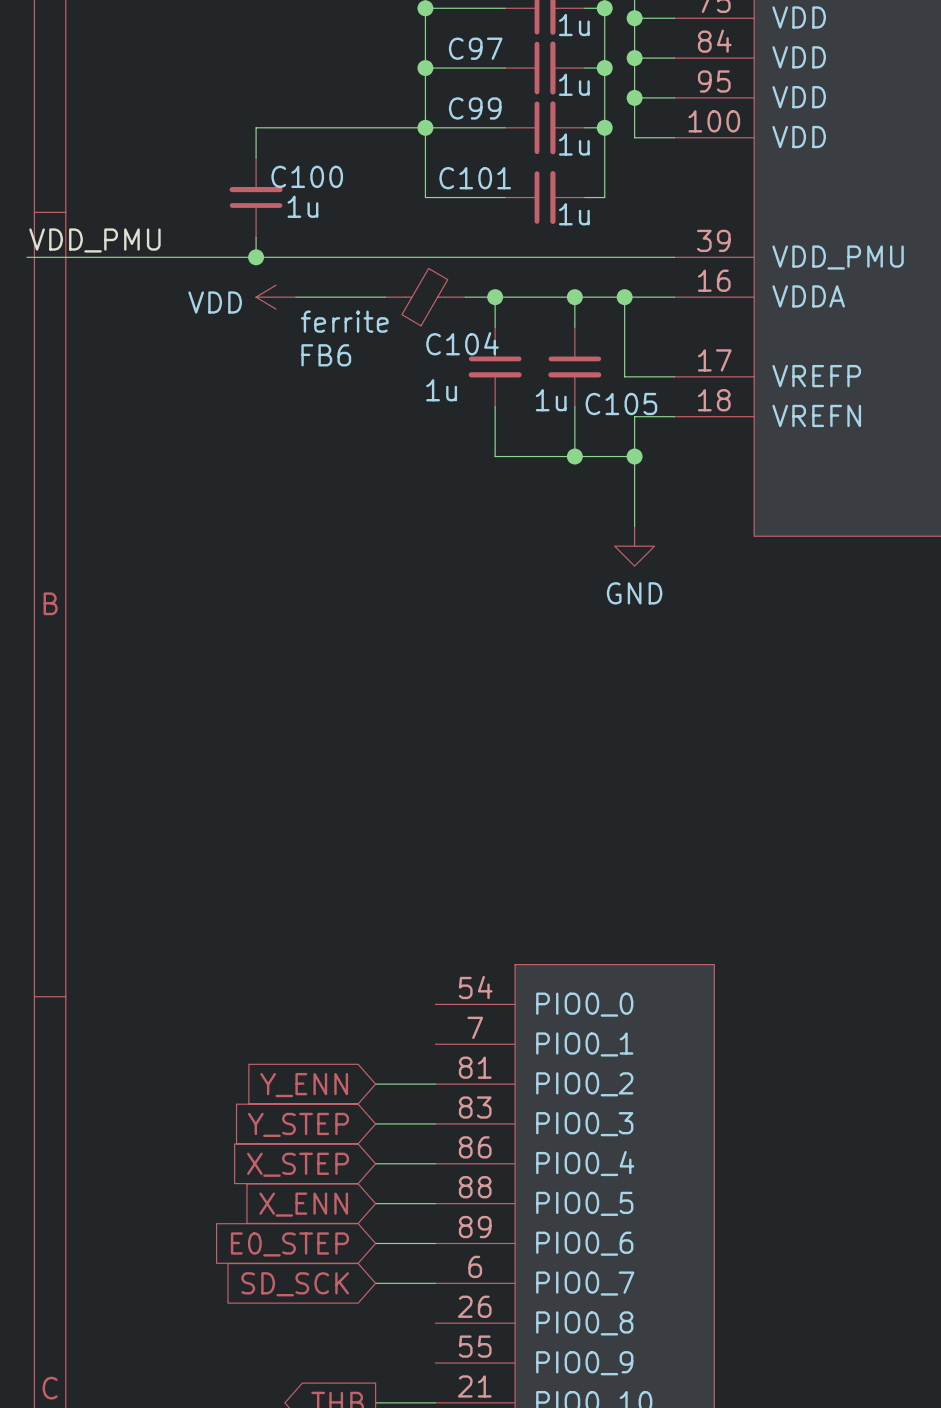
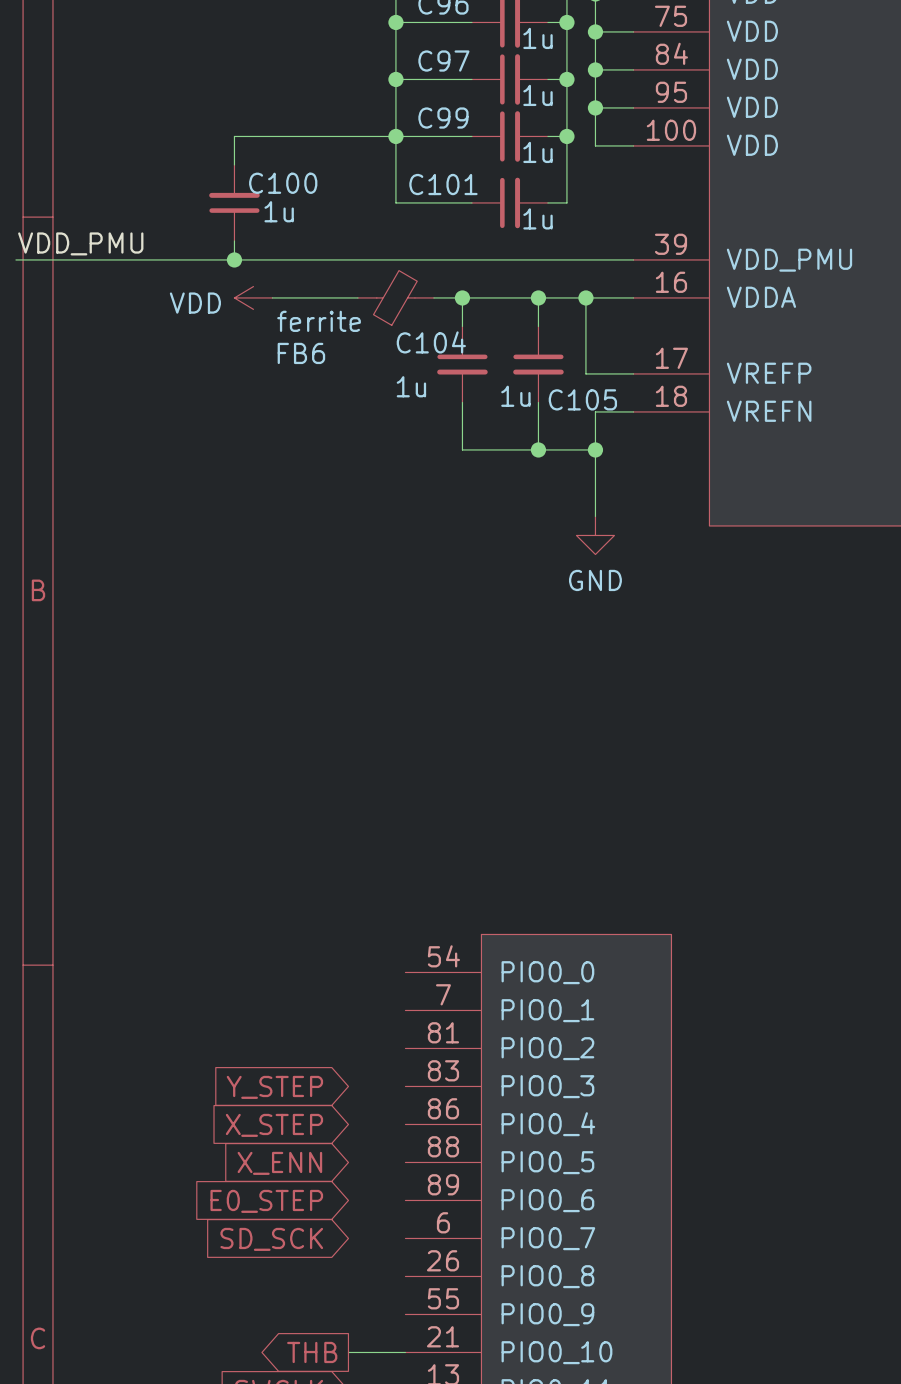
wire: (375, 1084) (435, 1084) -> none
global label: Y_ENN (304, 1085) -> none
wire: (375, 1123) (435, 1123) -> none
wire: (375, 1163) (435, 1163) -> none
wire: (375, 1203) (435, 1203) -> none
wire: (375, 1243) (435, 1243) -> none
wire: (375, 1283) (435, 1283) -> none

